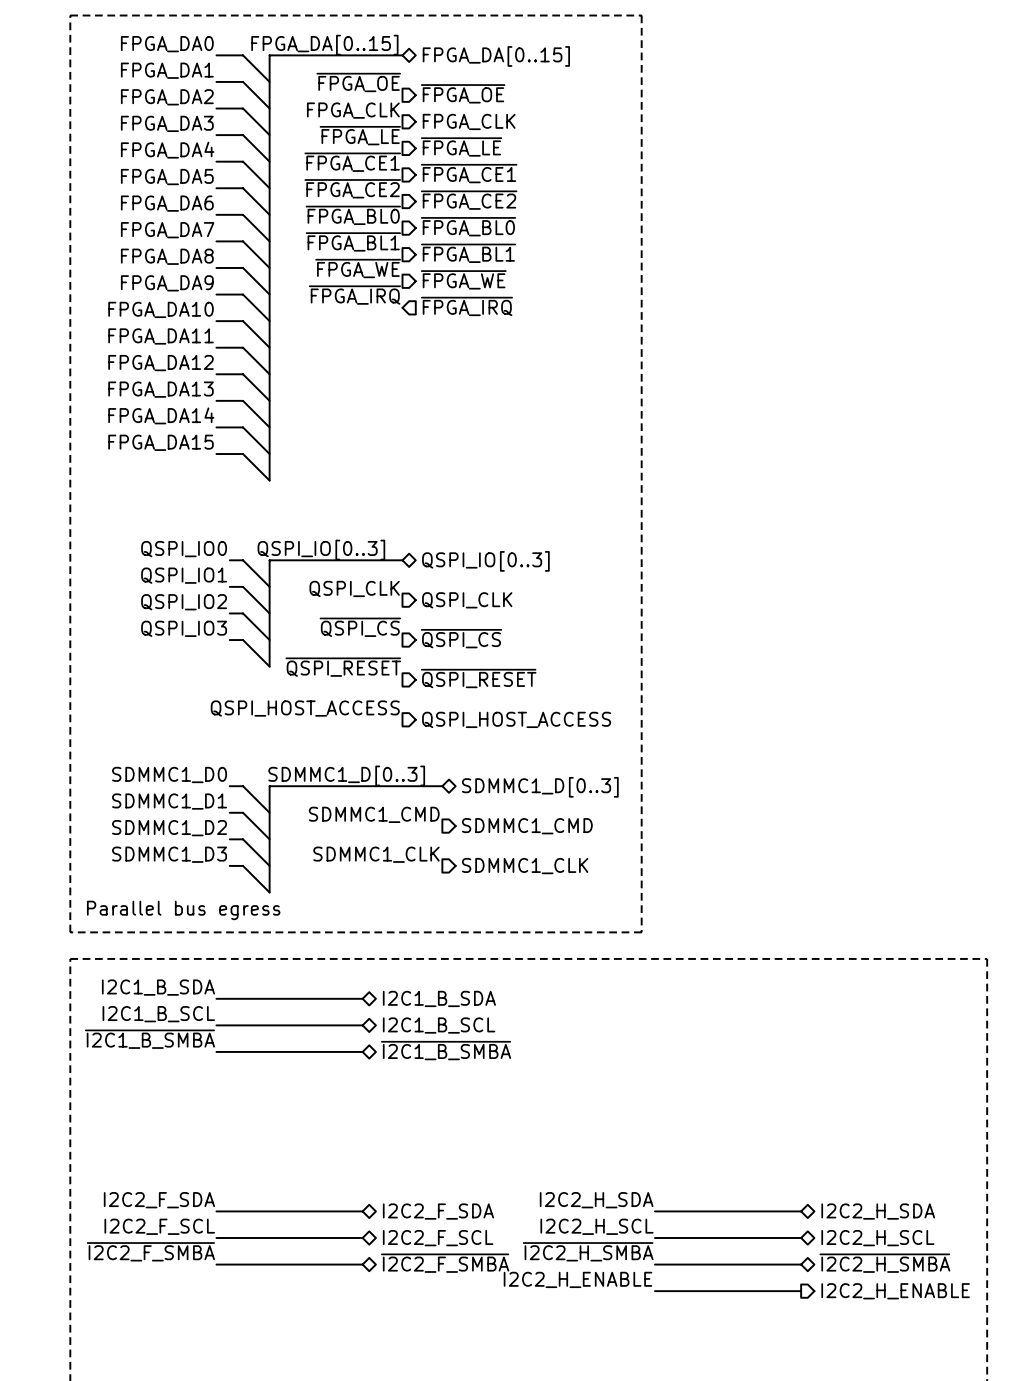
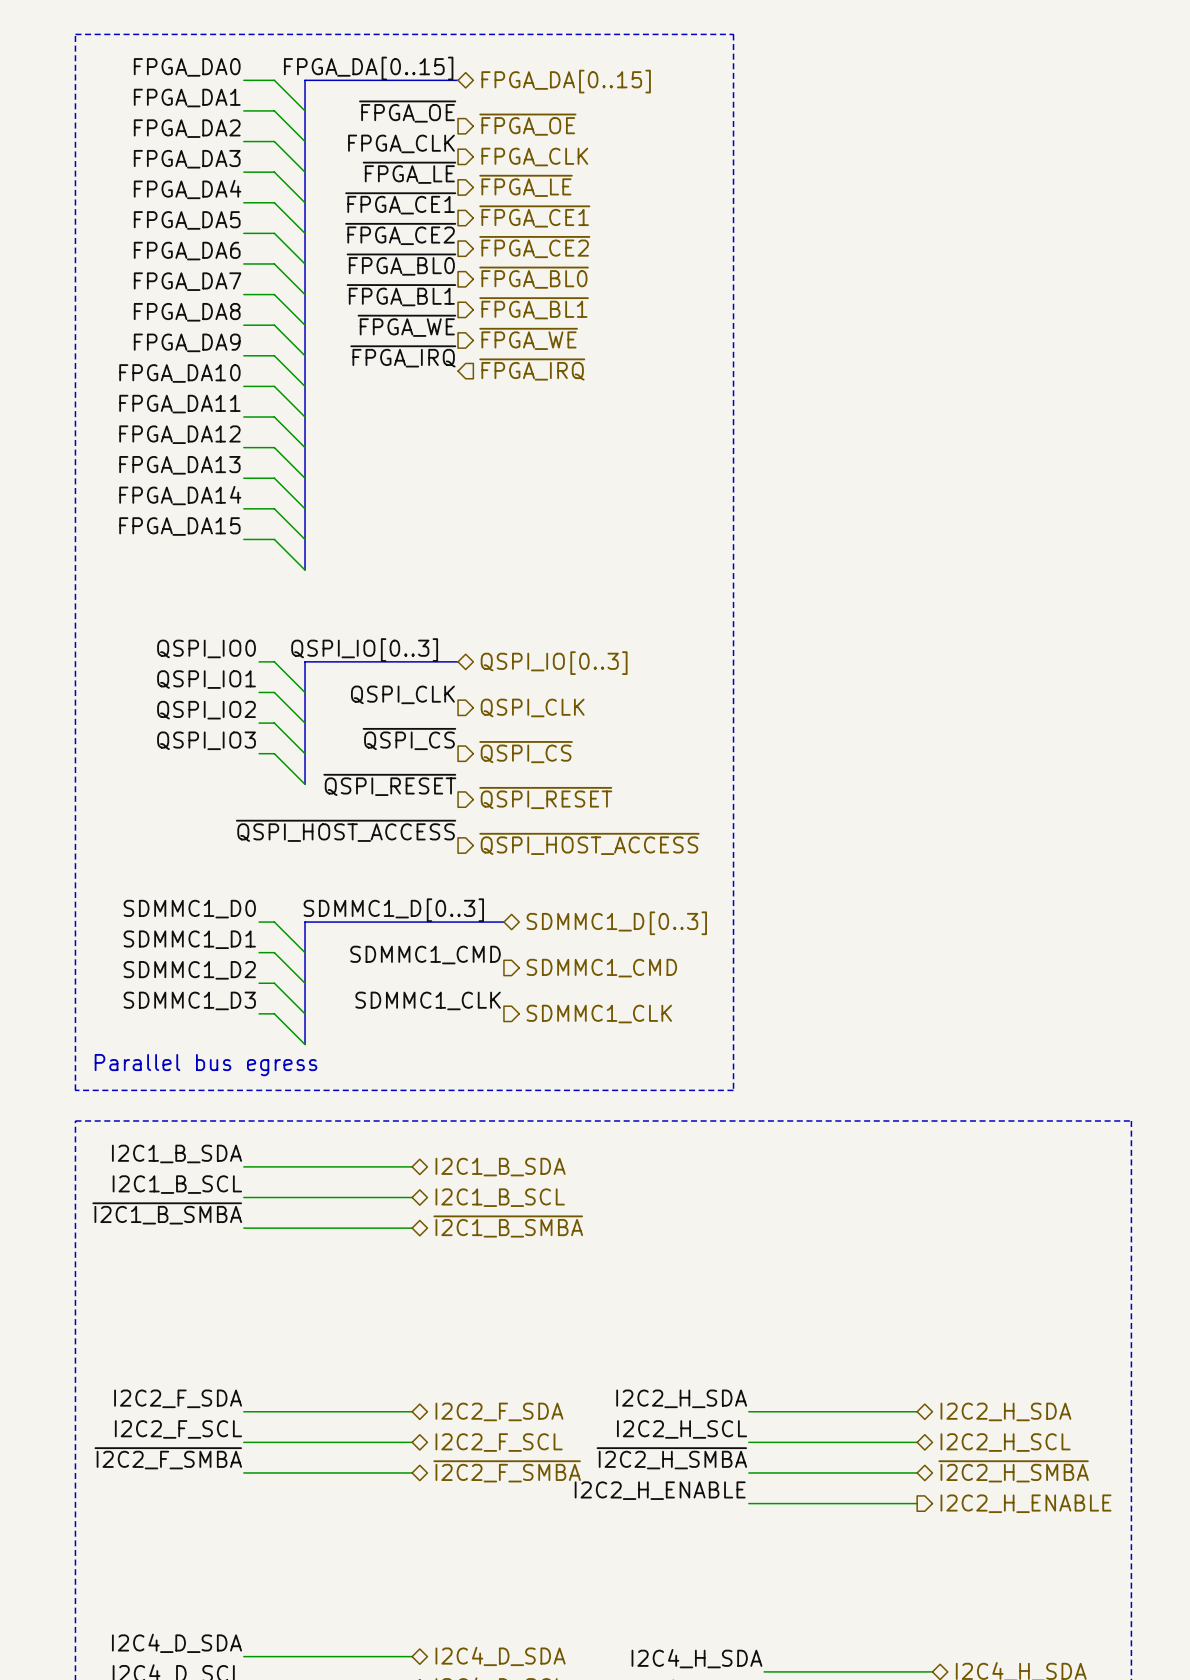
label: QSPI_HOST_ACCESS (305, 708) -> ~{QSPI_HOST_ACCESS} (346, 830)
hierarchical label: QSPI_HOST_ACCESS (516, 719) -> ~{QSPI_HOST_ACCESS} (589, 843)

